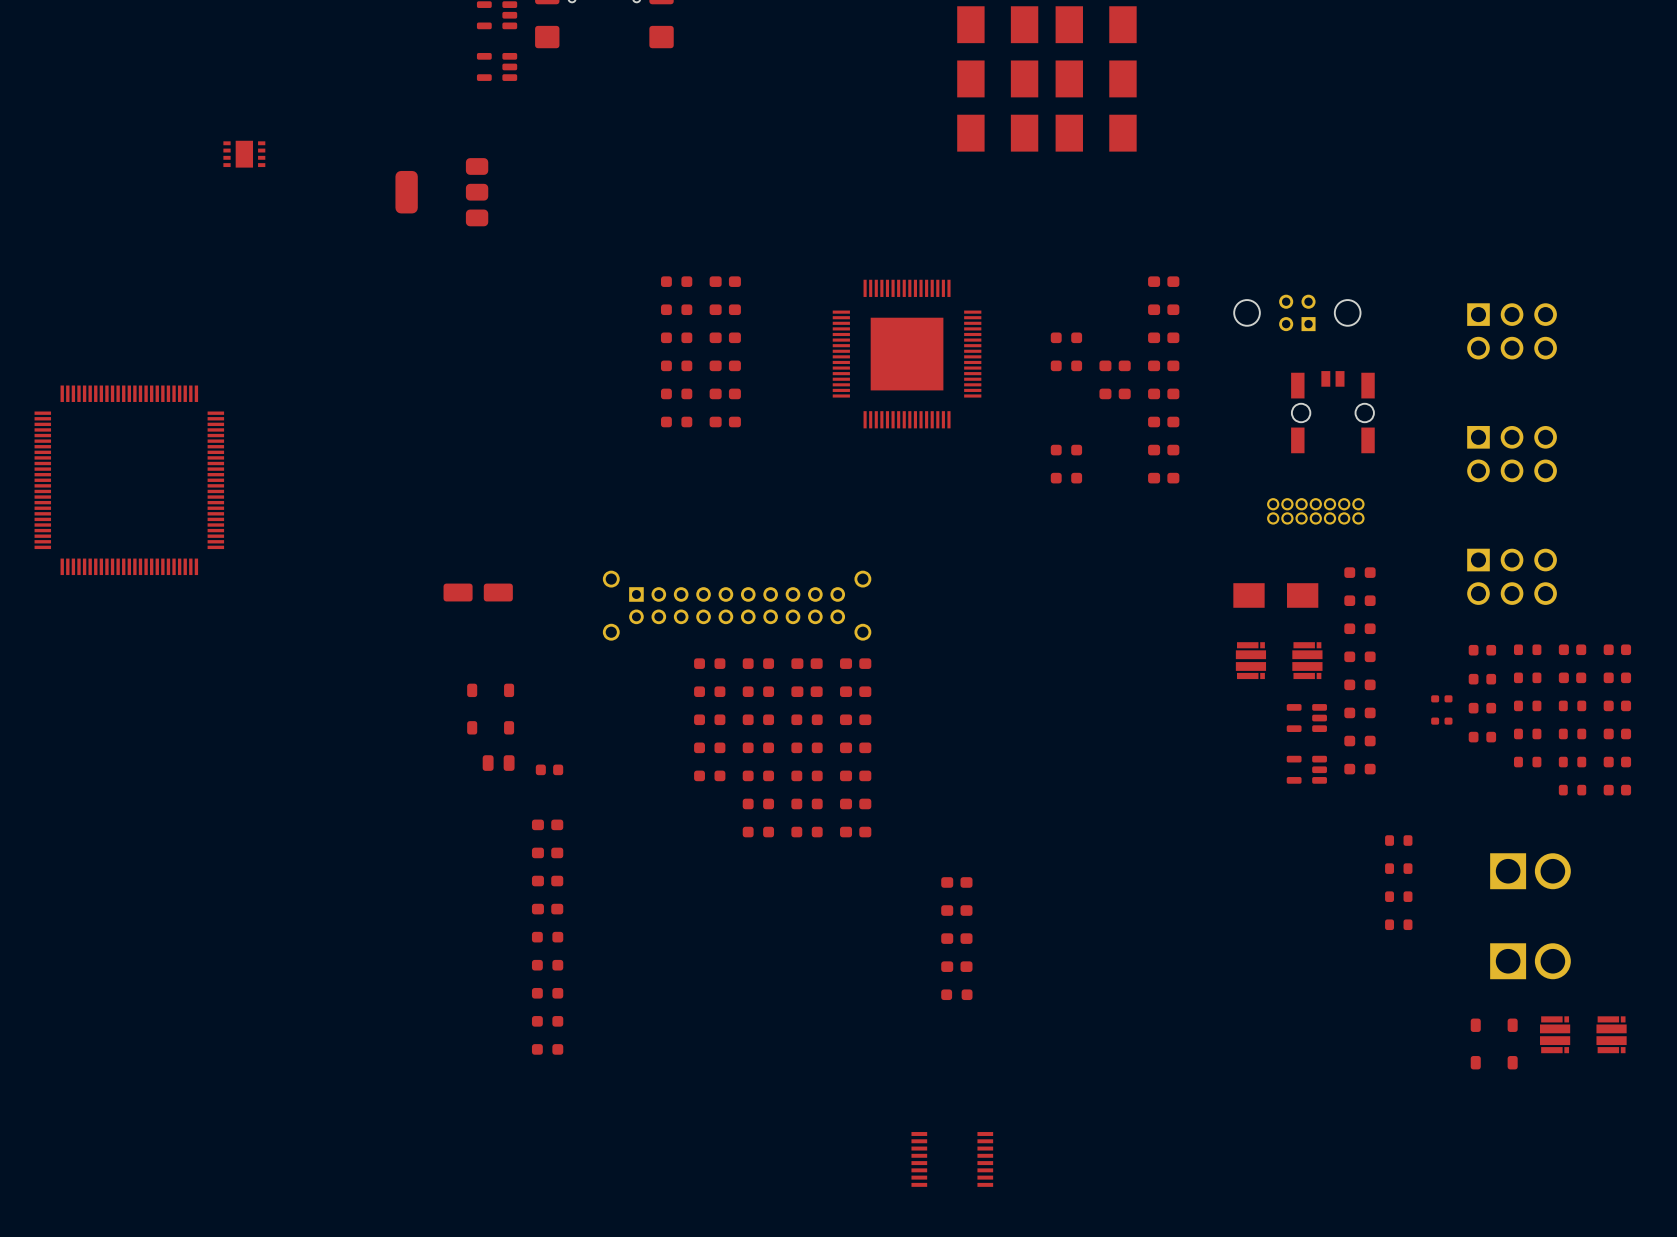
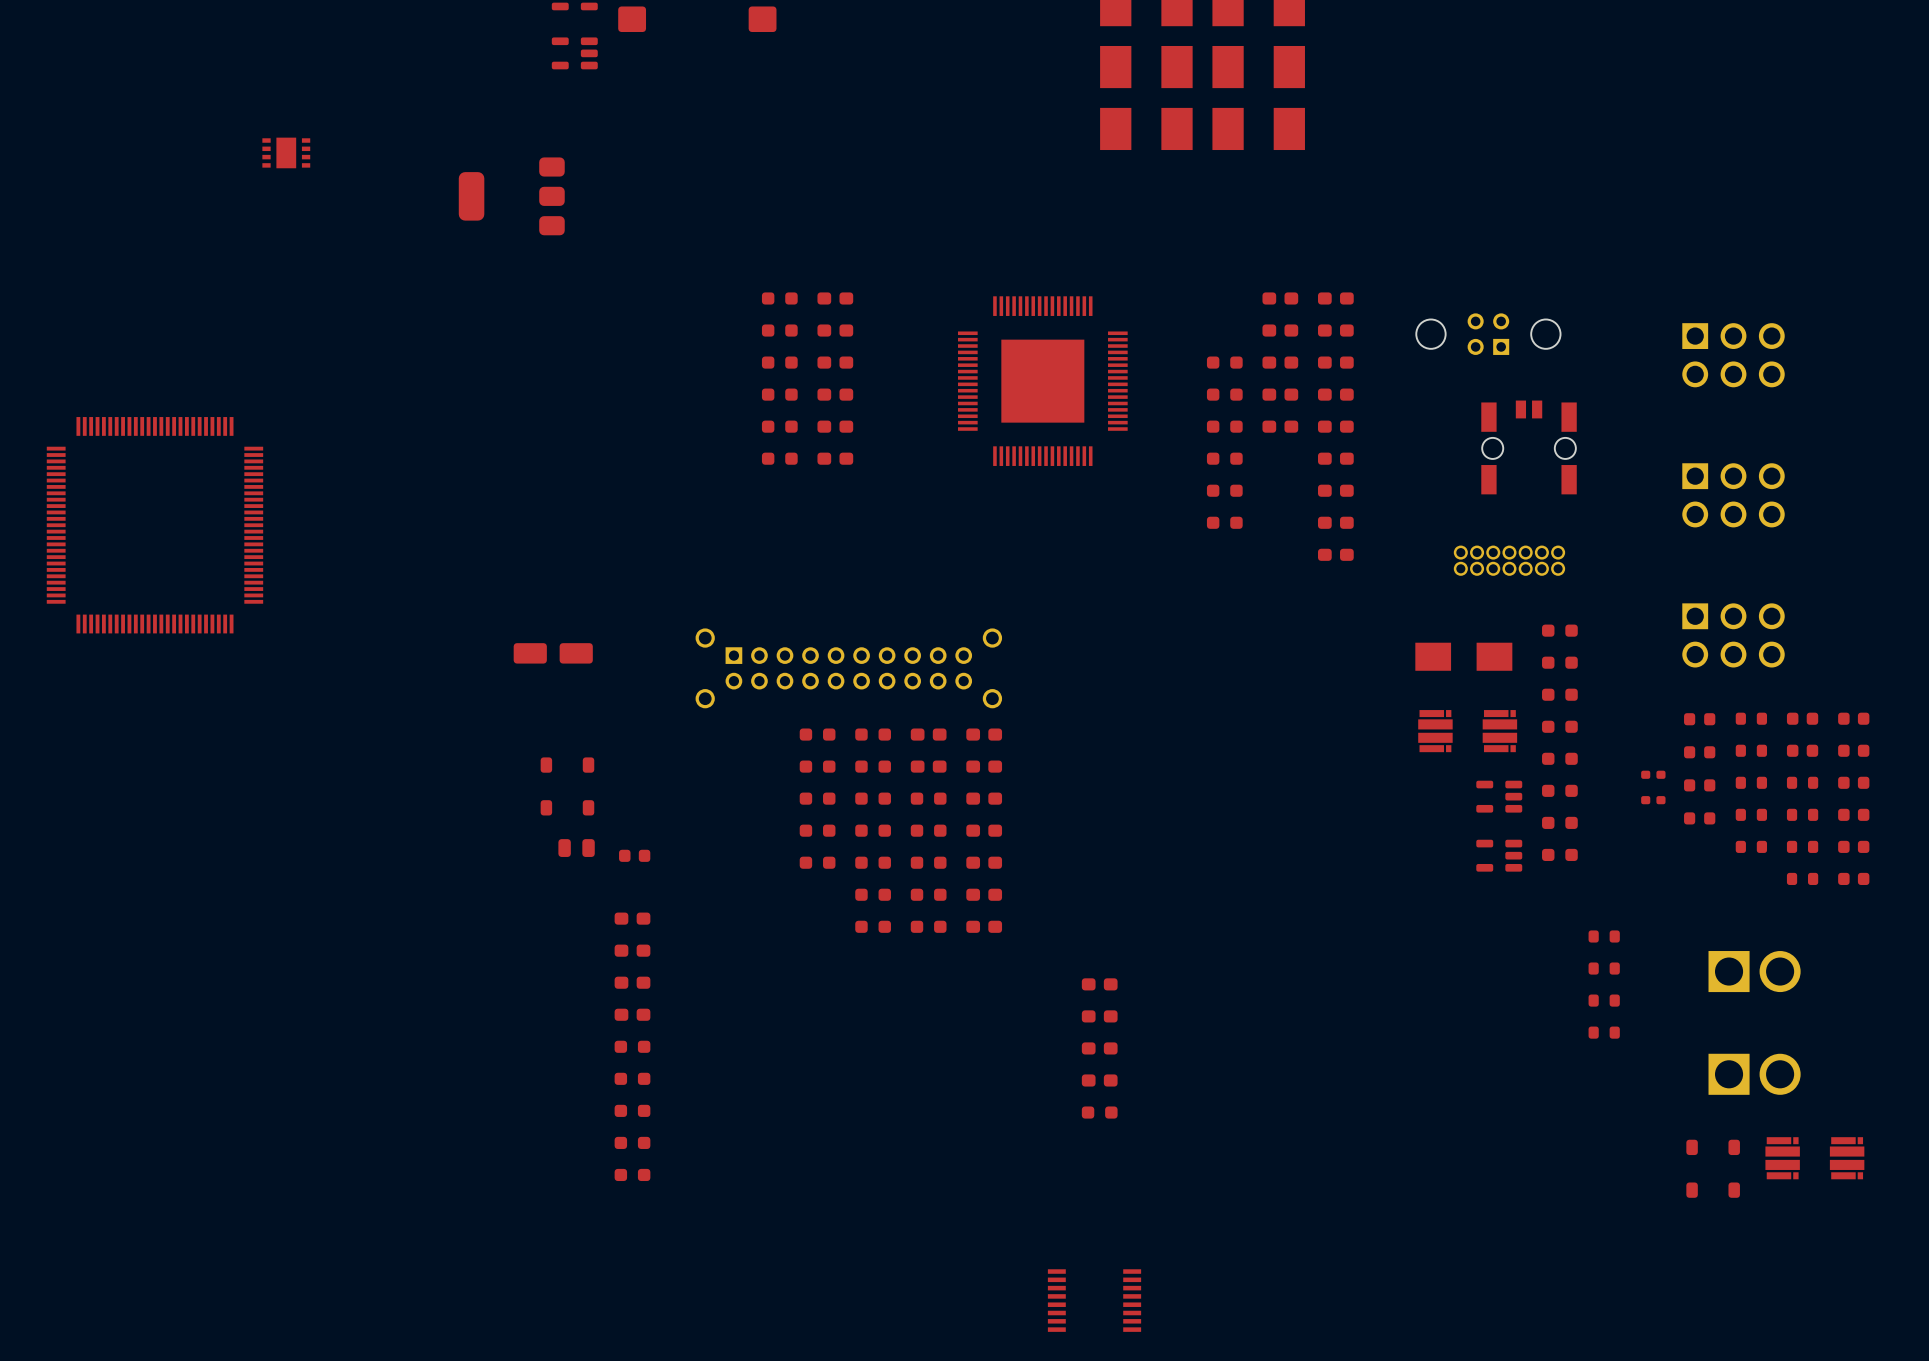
part: none -> (1280, 298)
part: none -> (1280, 330)
part: none -> (1280, 362)
part: none -> (1224, 426)
part: none -> (1224, 458)
part: none -> (1335, 554)

